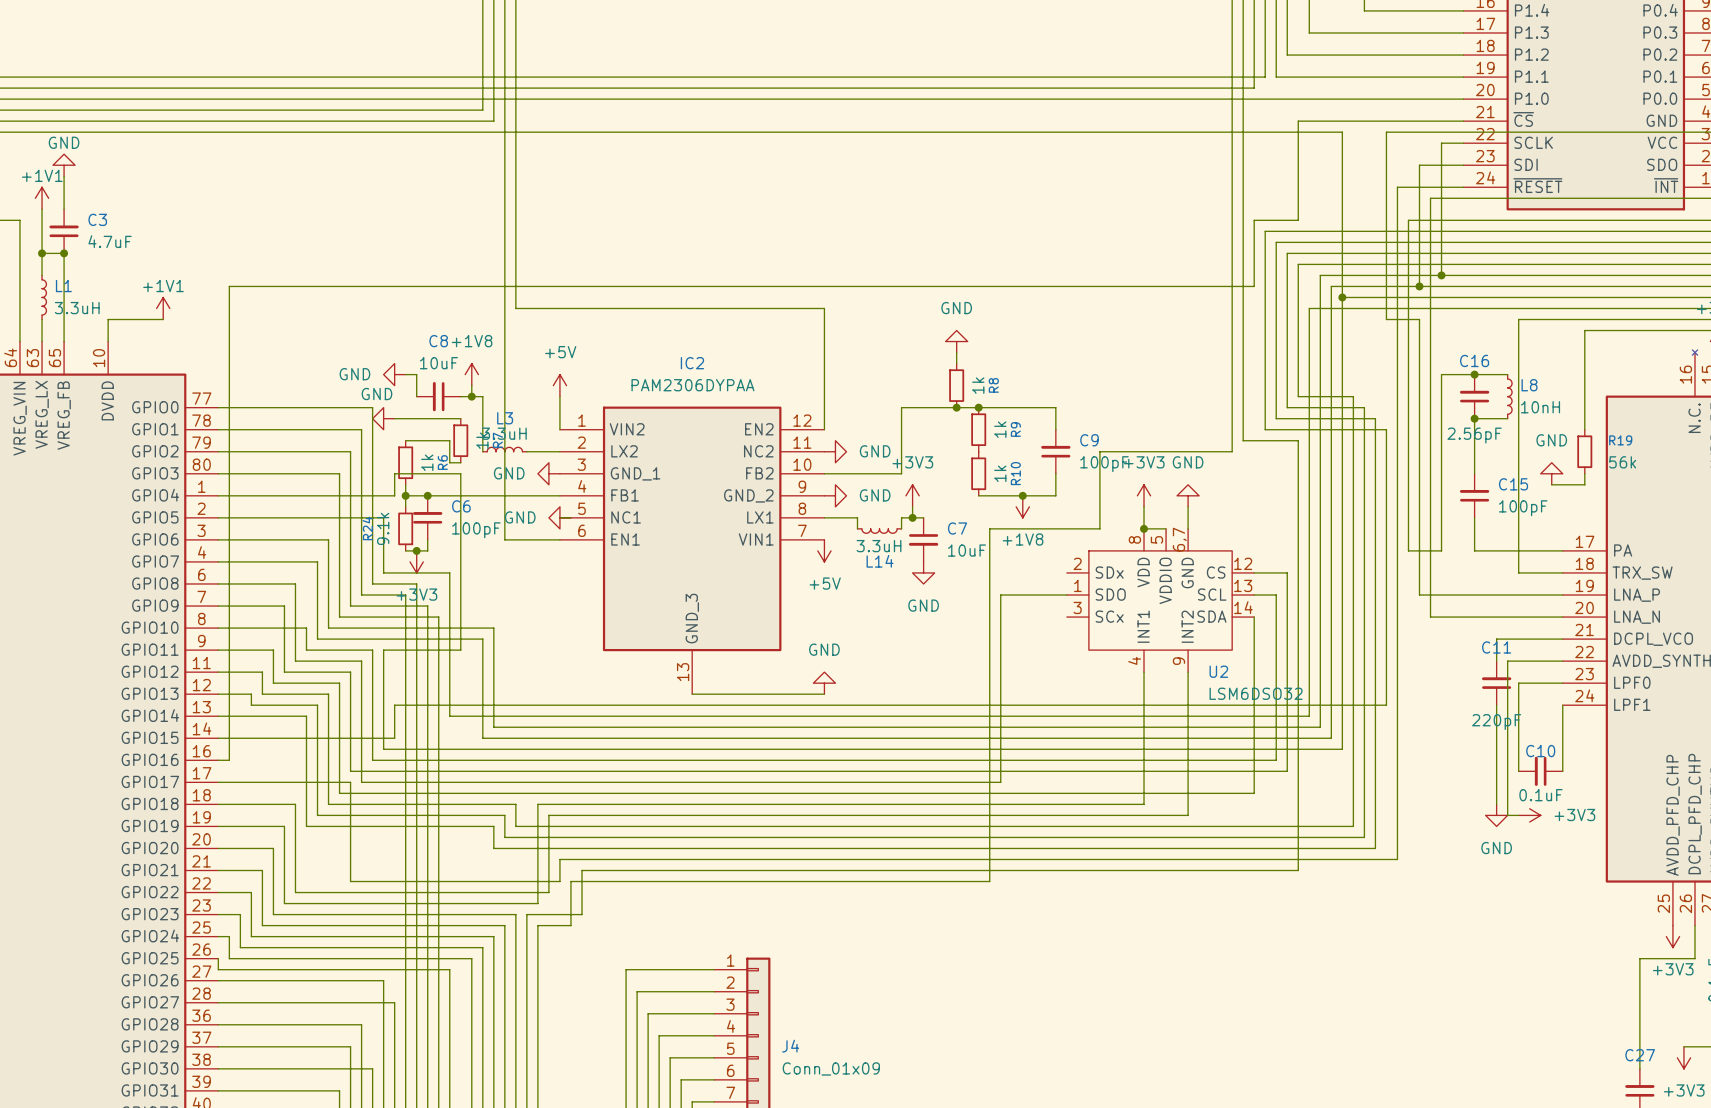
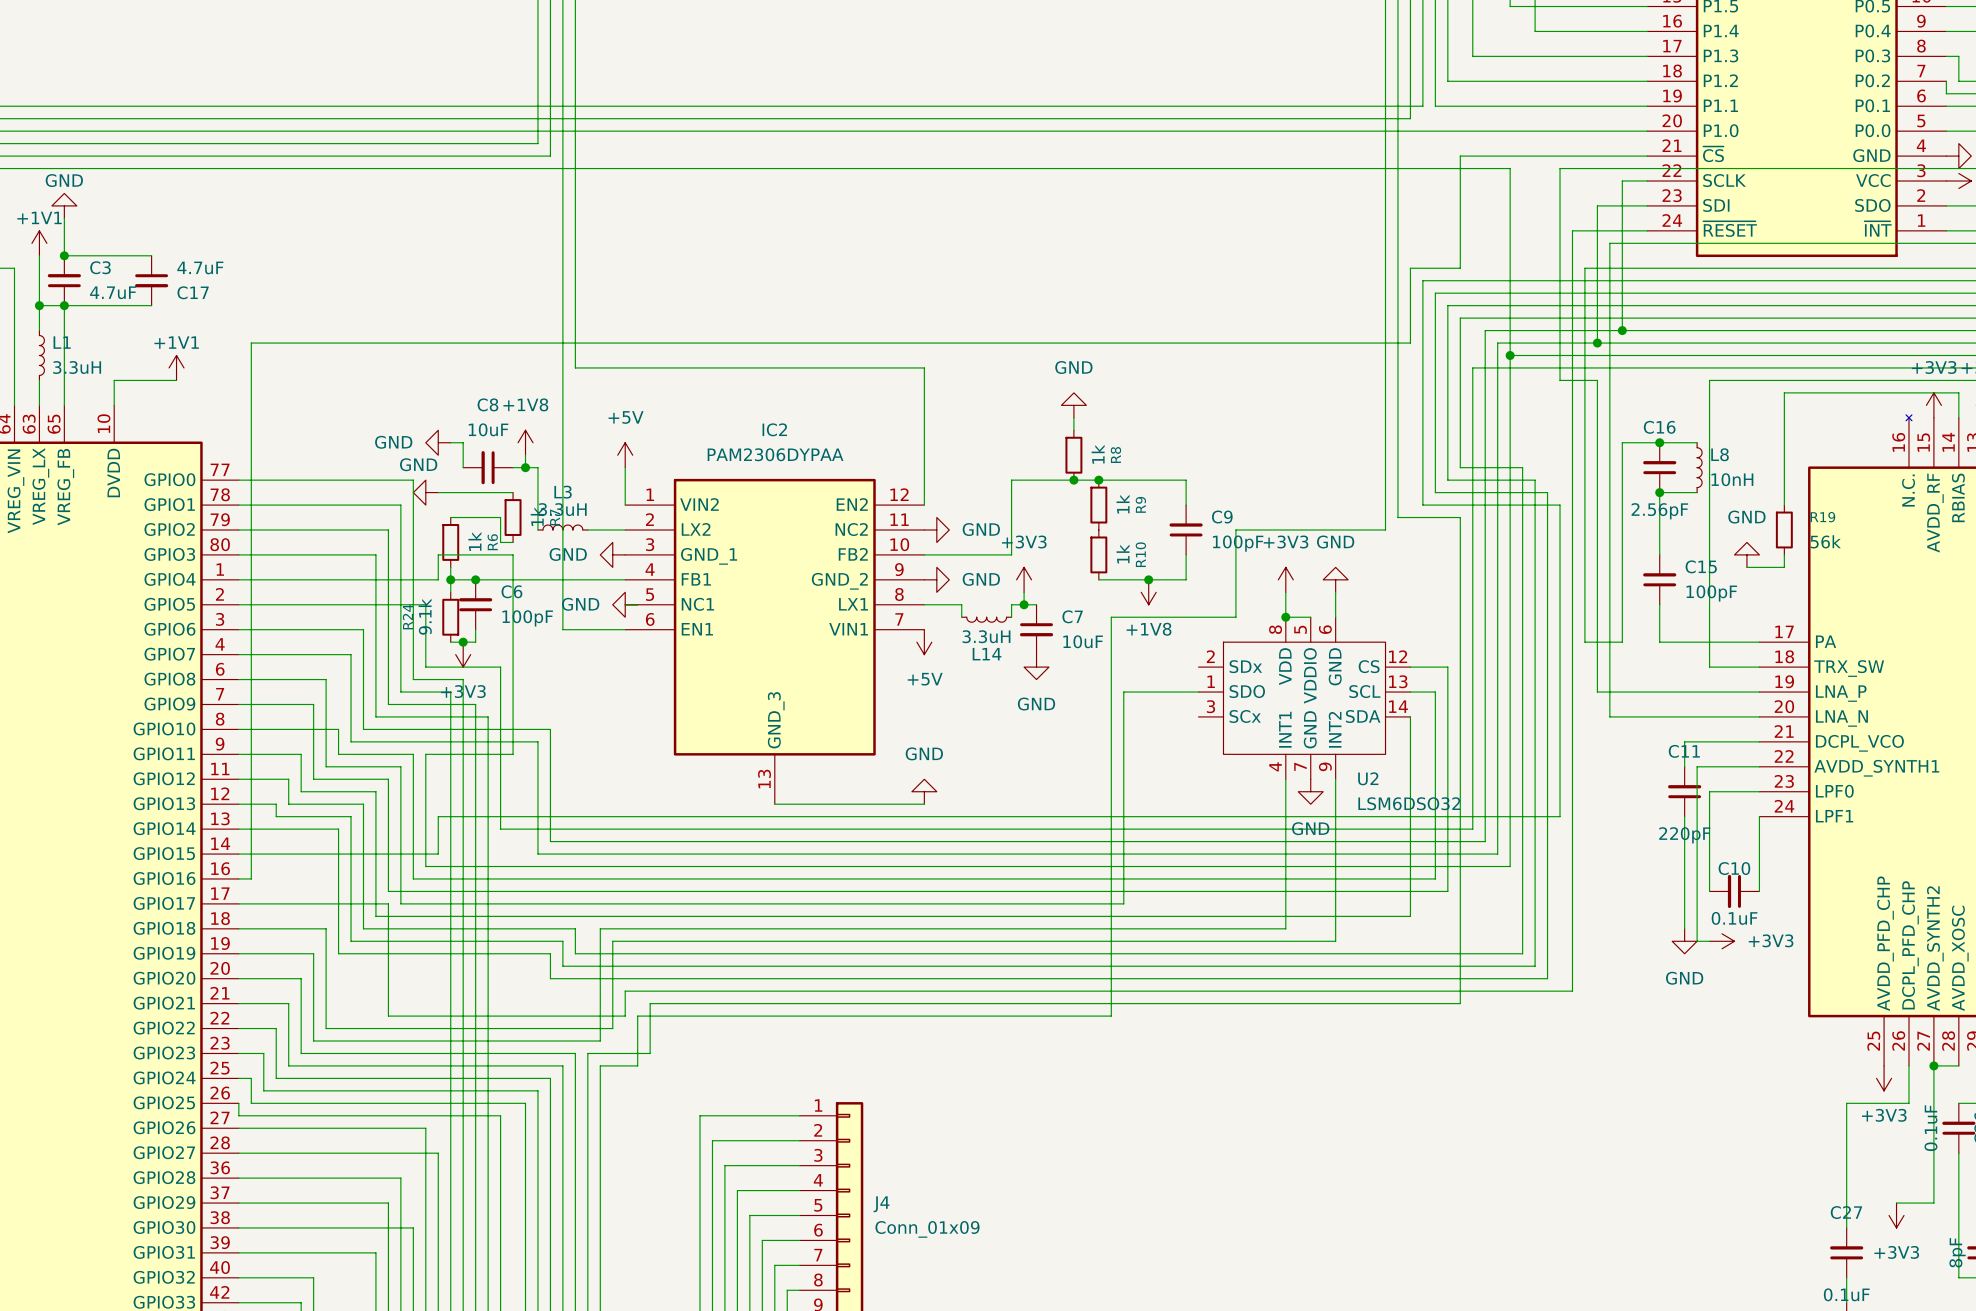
wire: none -> (64, 255) (151, 255)
junction: none -> (64, 255)
C17: none -> 4.7uF (151, 280)
wire: none -> (64, 305) (151, 305)
U2 symbol: [1066, 528, 1255, 673] -> [1198, 617, 1411, 780]
power symbol: none -> GND (1310, 791)

